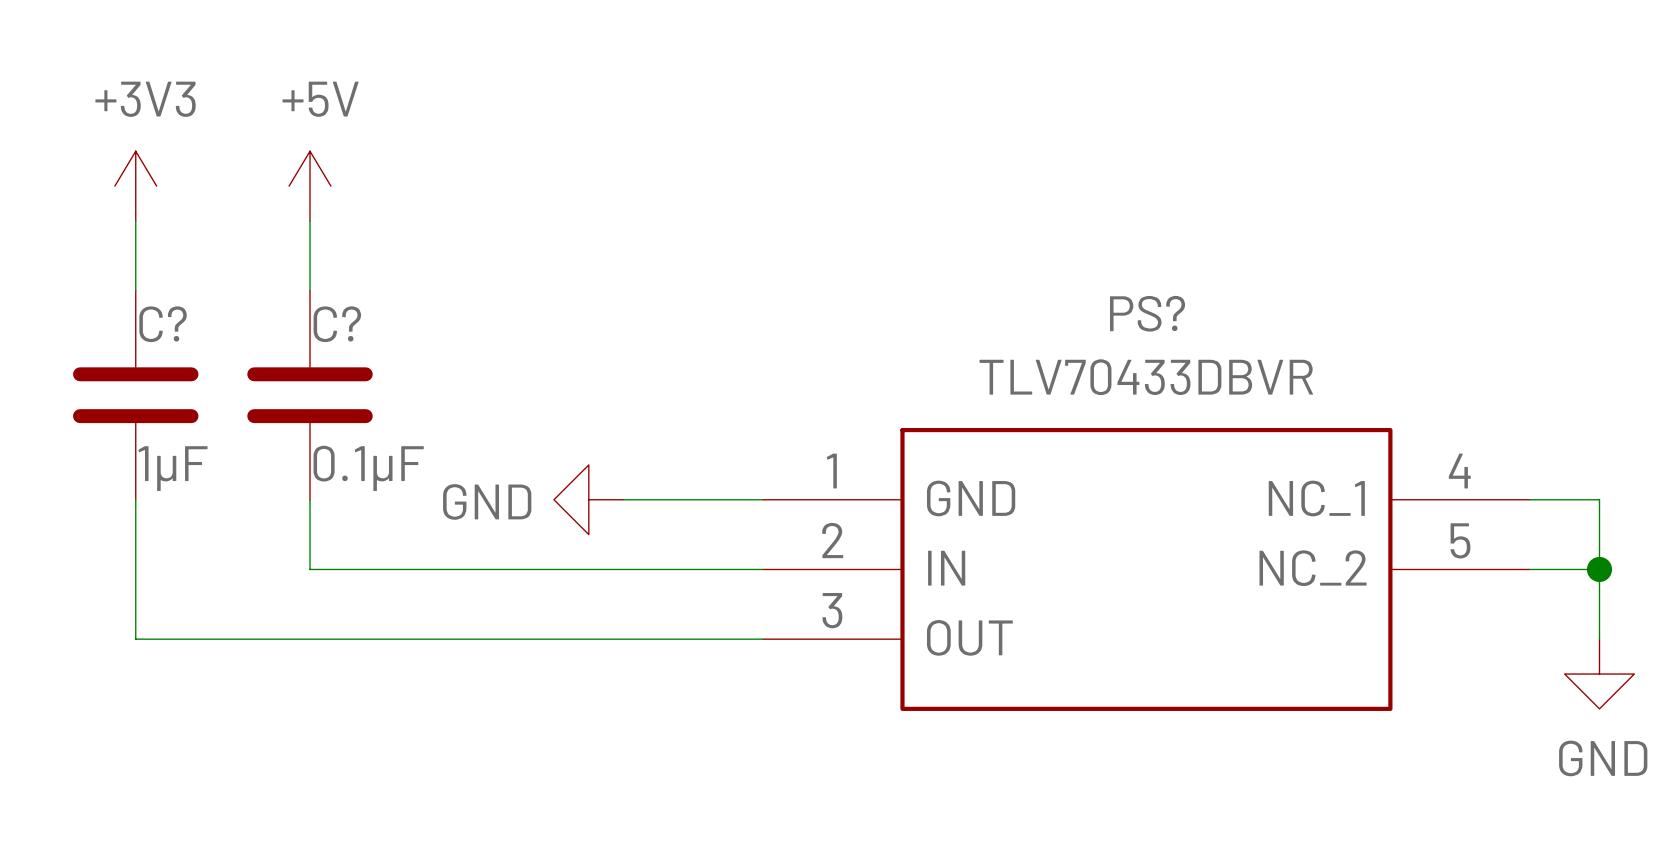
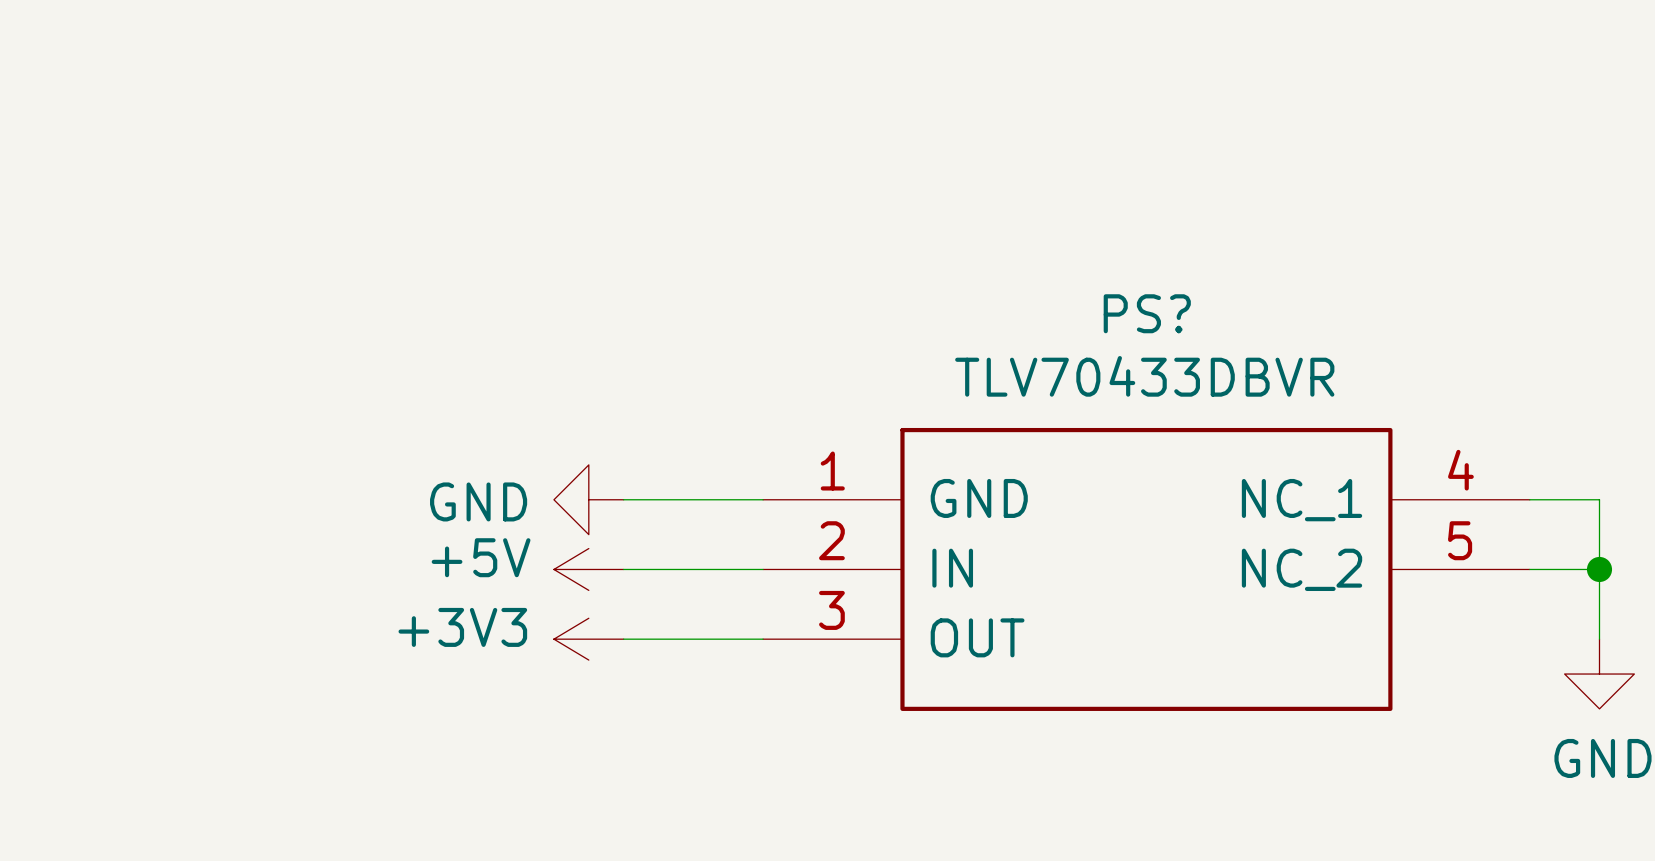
power symbol rotation: 0° (135, 186) -> 90° counterclockwise (588, 639)
power symbol position: +3V3 (135, 186) -> +3V3 (588, 639)
power symbol rotation: 0° (310, 186) -> 90° counterclockwise (588, 569)
power symbol position: +5V (310, 186) -> +5V (588, 569)
wire: (135, 220) (135, 290) -> none
wire: (310, 220) (310, 290) -> none
C?: 1µF (135, 395) -> none
C?: 0.1µF (310, 395) -> none
wire: (135, 499) (135, 639) (623, 639) -> none
wire: (310, 499) (310, 569) (623, 569) -> none

